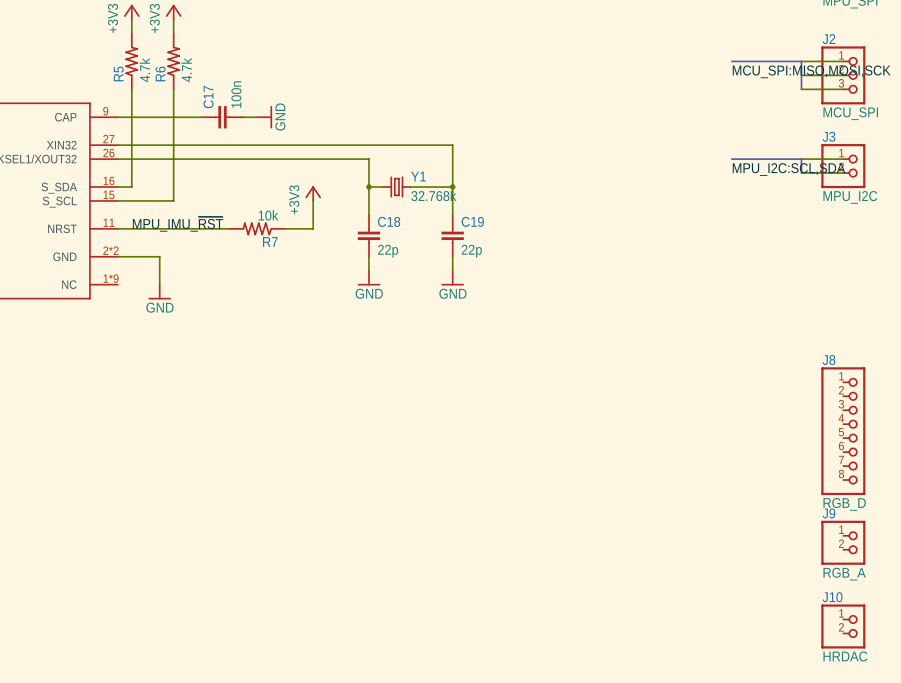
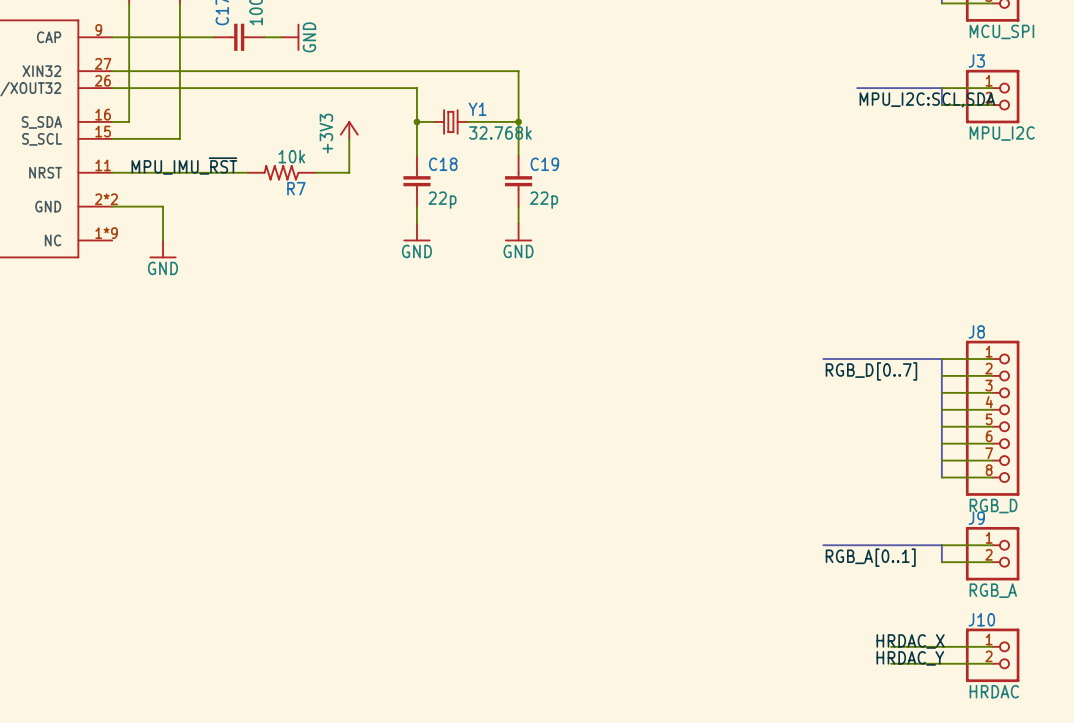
bus: none -> (823, 359) (941, 359) (941, 477)
wire: none -> (941, 359) (992, 359)
label: none -> RGB_D[0..7] (871, 371)
wire: none -> (941, 375) (992, 375)
wire: none -> (941, 392) (992, 392)
wire: none -> (941, 409) (992, 409)
wire: none -> (941, 426) (992, 426)
wire: none -> (941, 443) (992, 443)
wire: none -> (941, 460) (992, 460)
wire: none -> (941, 477) (992, 477)
bus: none -> (823, 545) (941, 545) (941, 562)
wire: none -> (941, 545) (992, 545)
label: none -> RGB_A[0..1] (870, 557)
wire: none -> (941, 562) (992, 562)
label: none -> HRDAC_X (910, 641)
wire: none -> (891, 646) (992, 646)
label: none -> HRDAC_Y (910, 658)
wire: none -> (891, 663) (992, 663)

